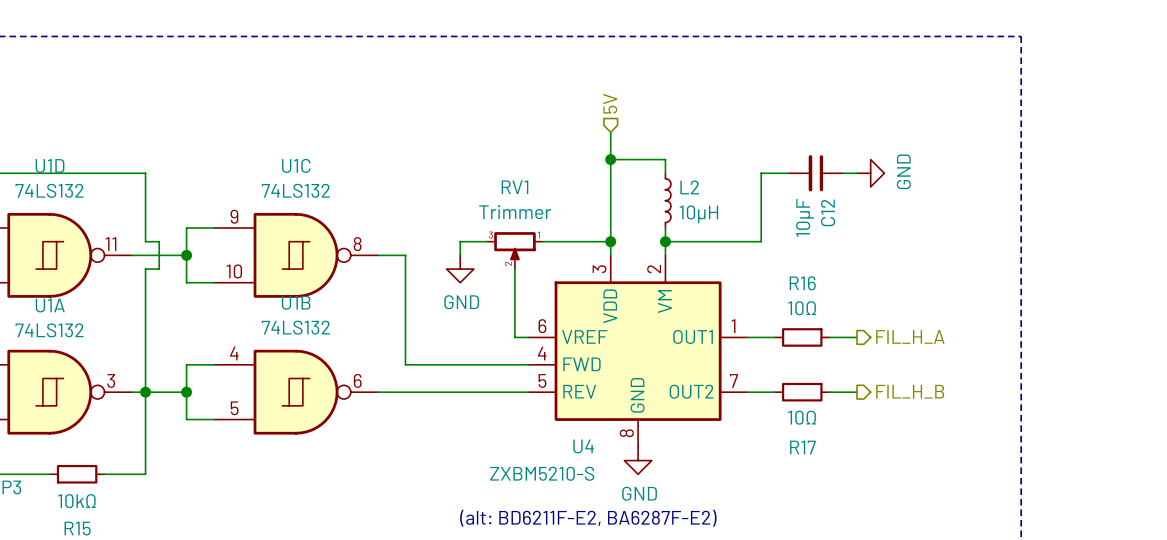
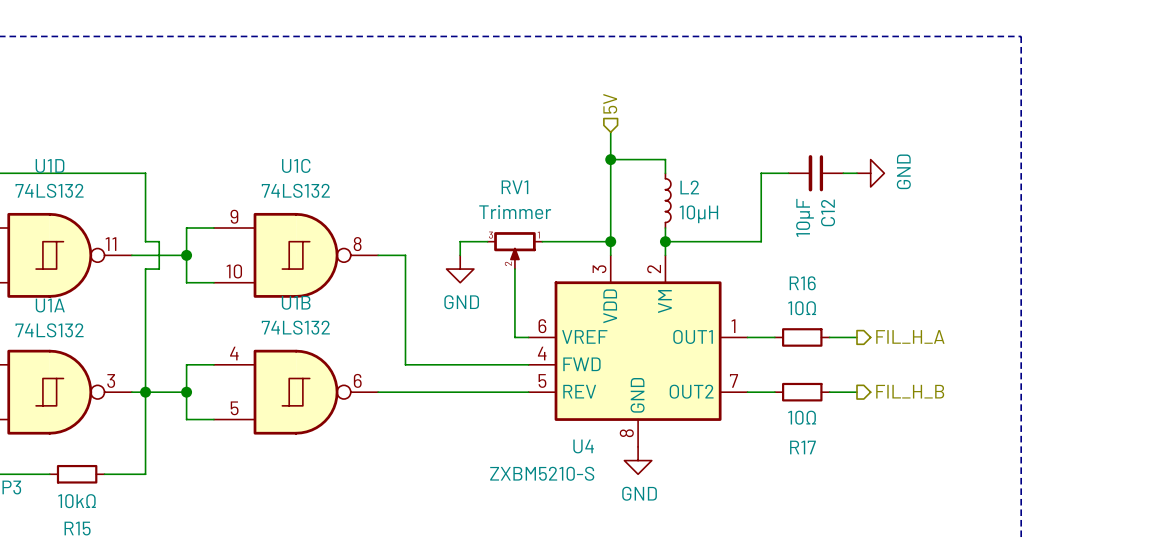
text: (alt: BD6211F-E2, BA6287F-E2) (588, 518) -> none

